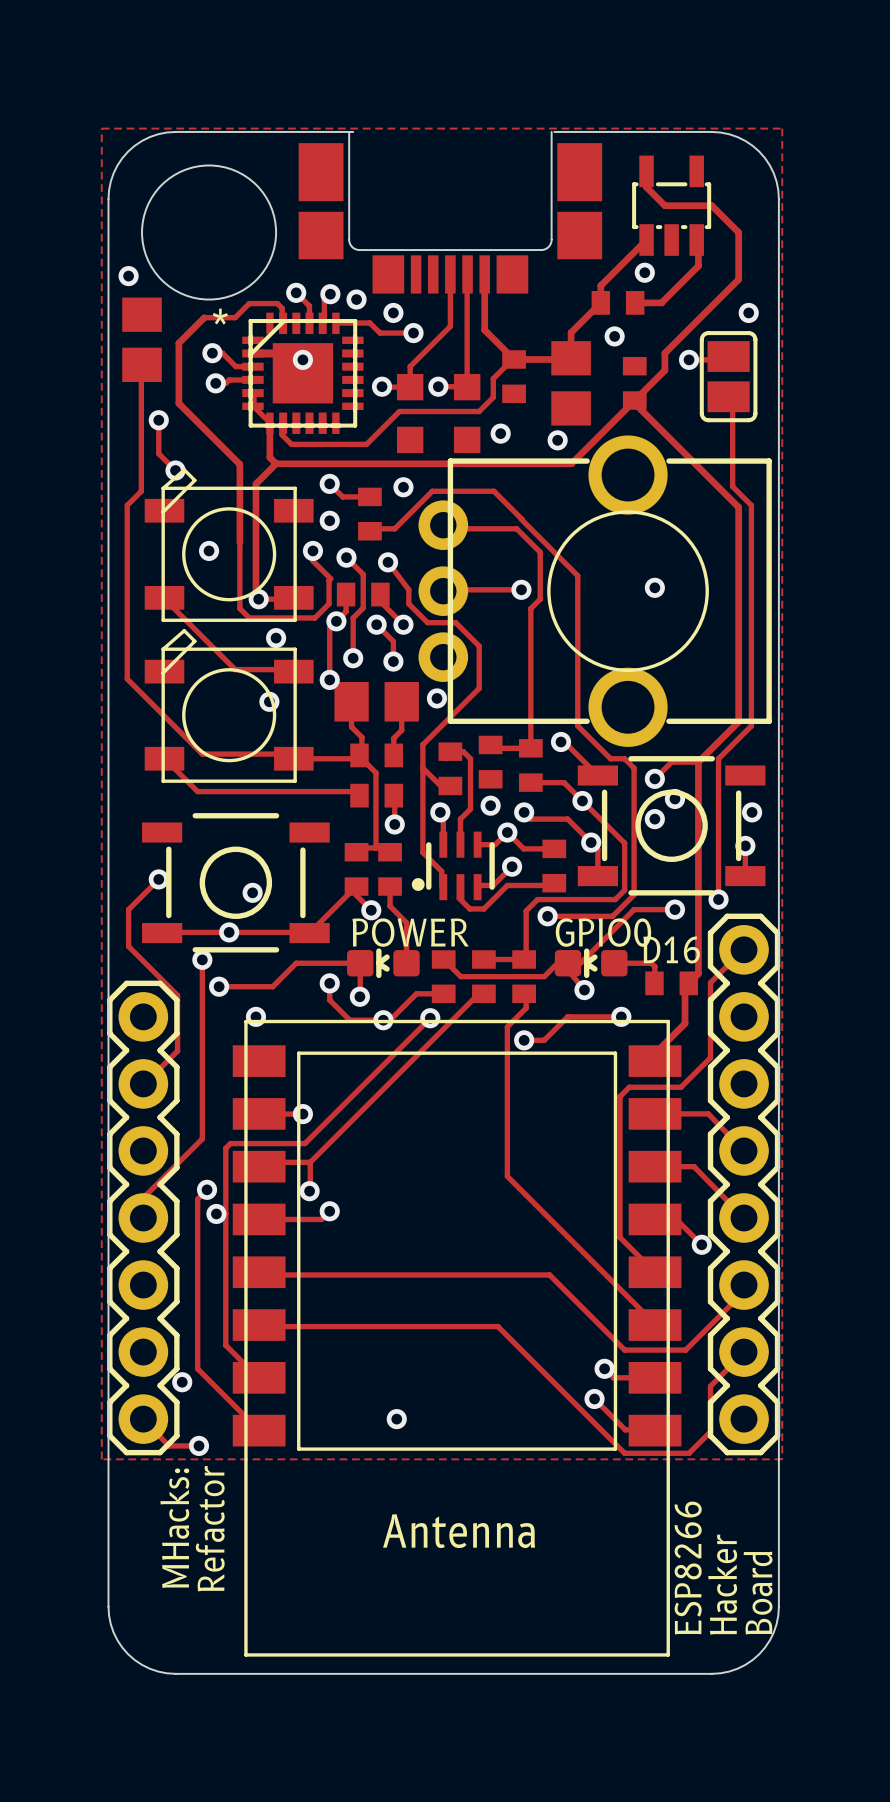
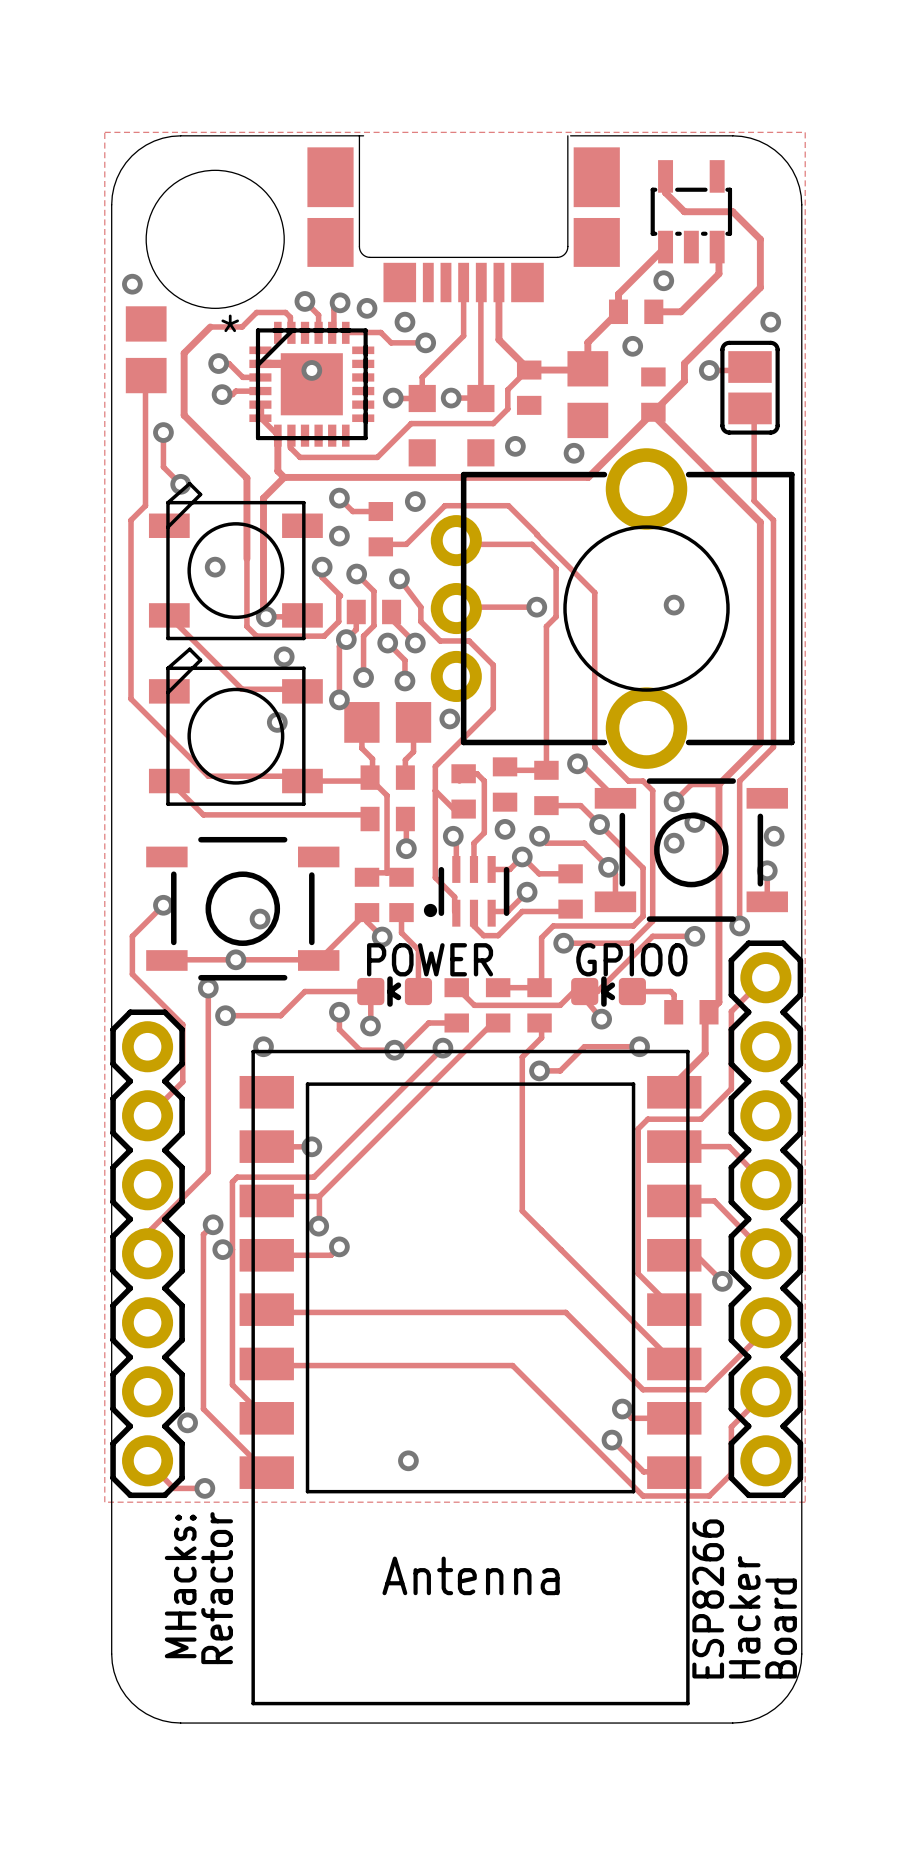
text: D16 (671, 949) -> none

